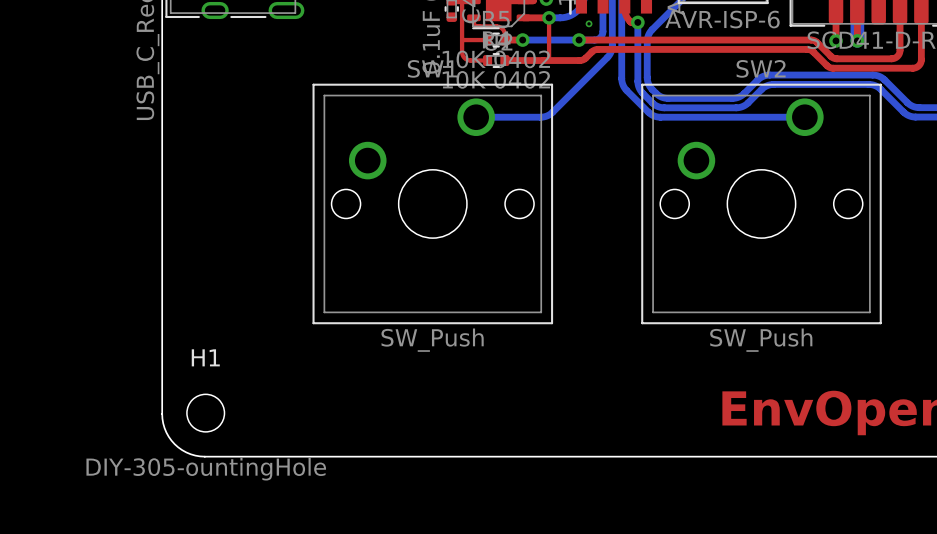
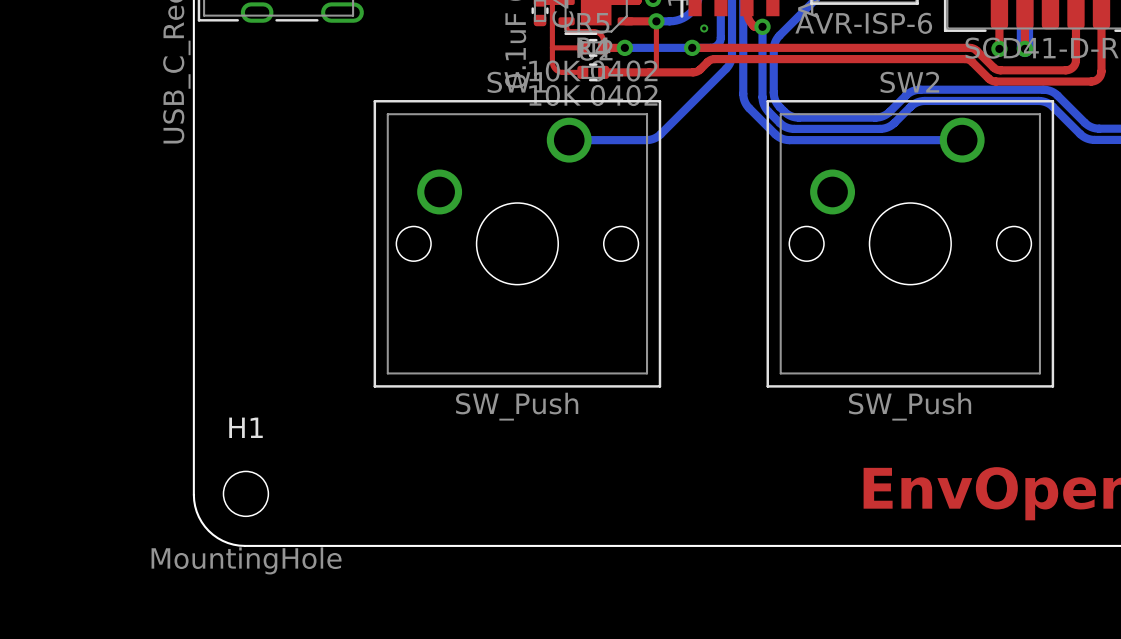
H1 value: DIY-305-ountingHole (206, 469) -> MountingHole (246, 560)

